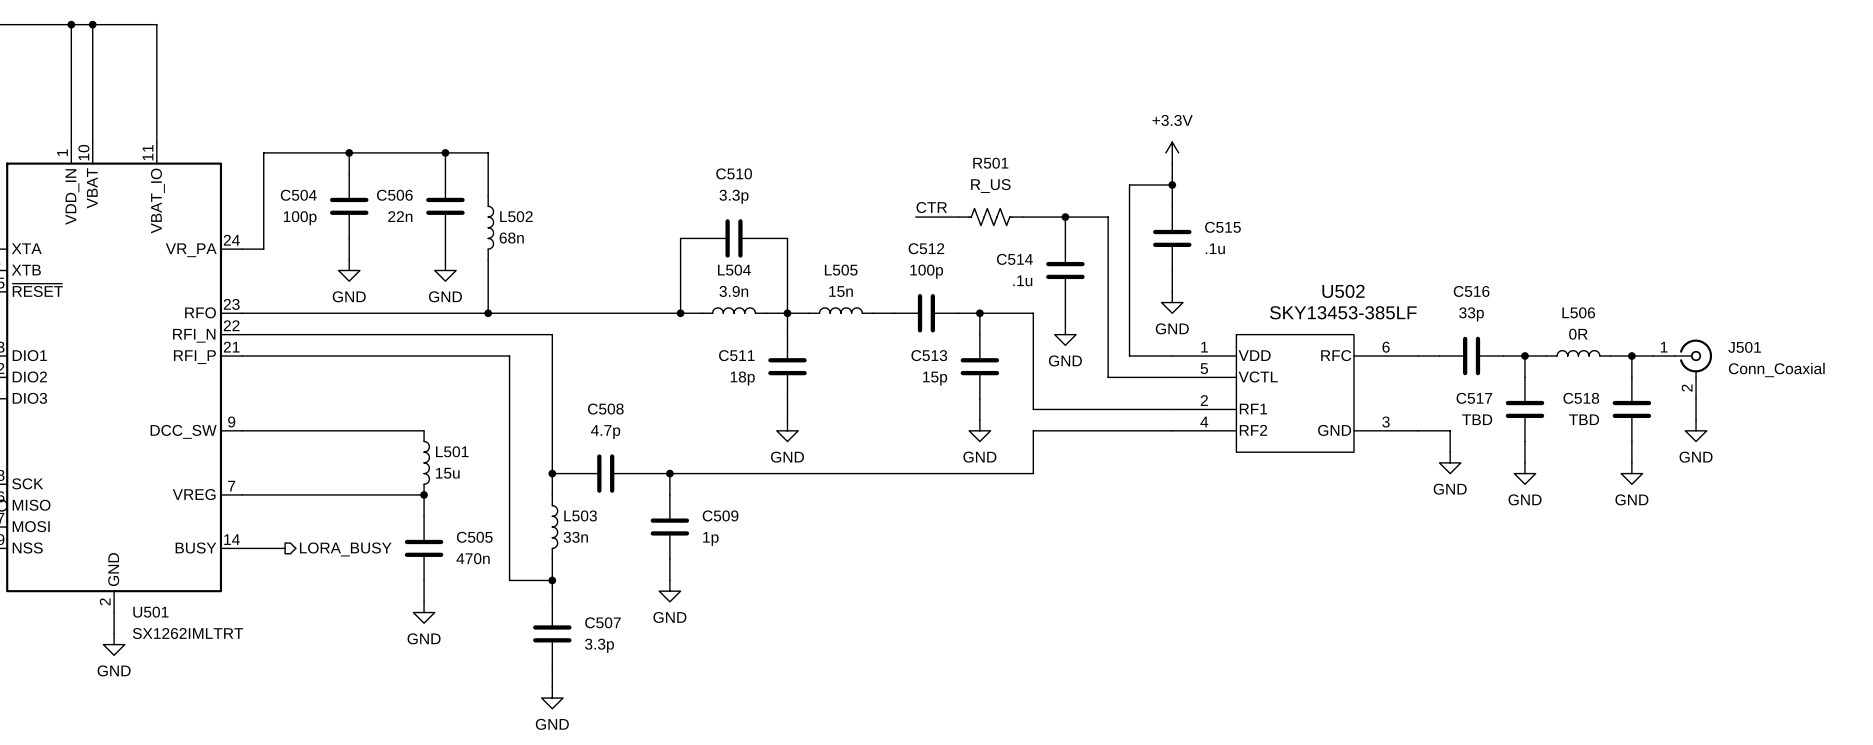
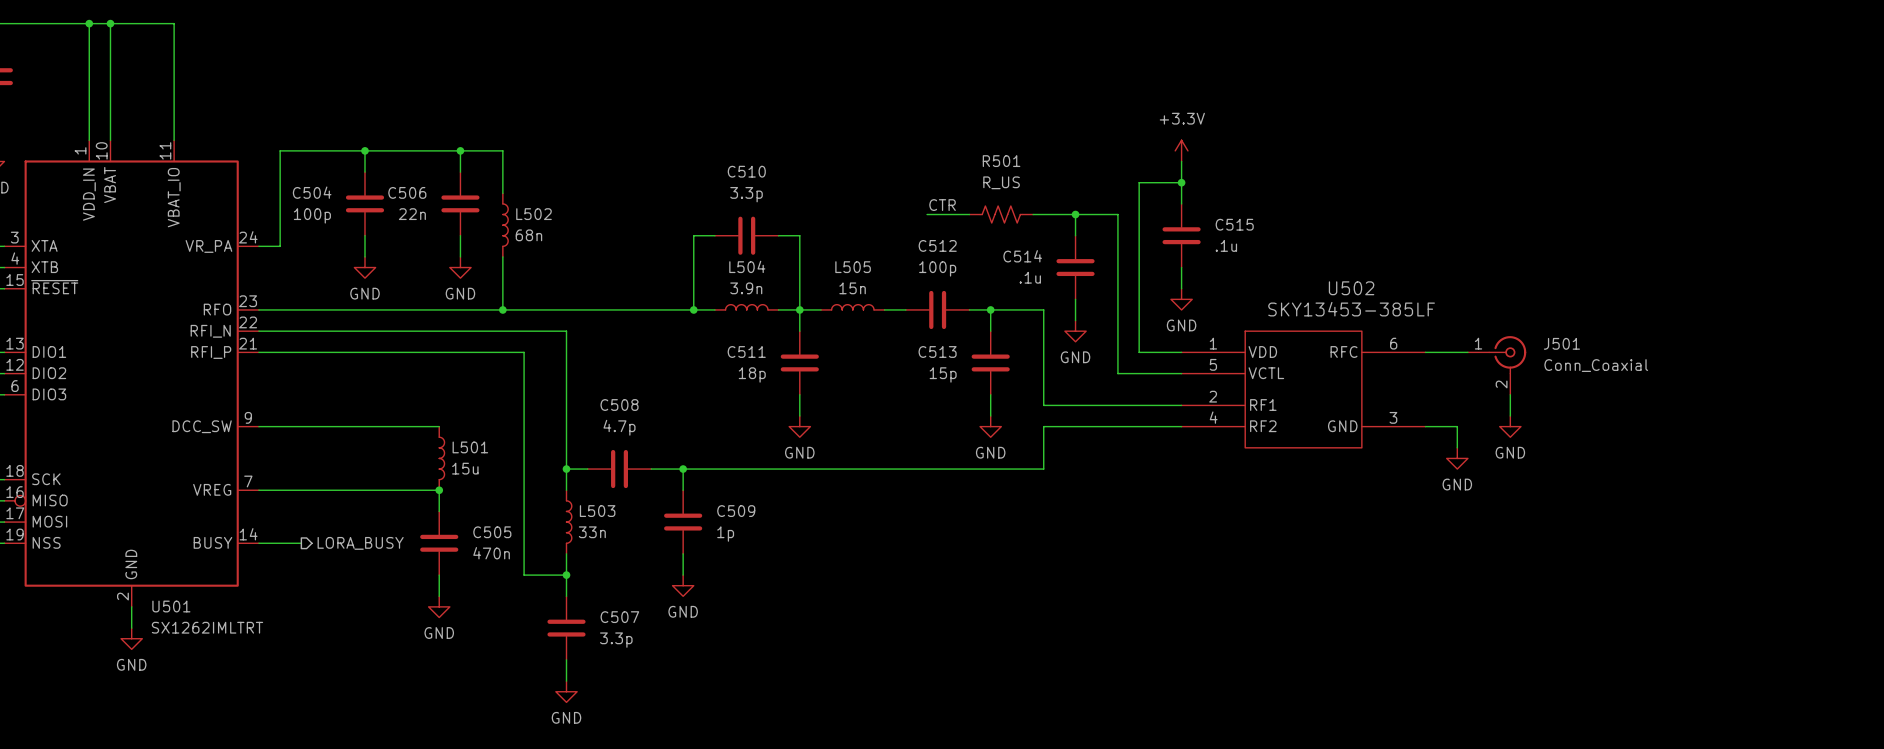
L506: 0R (1578, 353) -> none
C516: 33p (1471, 356) -> none
wire: (1503, 356) (1546, 356) -> none
wire: (1525, 356) (1525, 377) -> (1510, 394) (1510, 416)
junction: (1525, 356) -> none
wire: (1610, 356) (1653, 356) -> none
wire: (1631, 356) (1631, 377) -> none
junction: (1631, 356) -> none
J501 position: (1682, 369) -> (1497, 365)
wire: (1696, 398) (1696, 420) -> none
C517: TBD (1525, 409) -> none
C518: TBD (1631, 409) -> none
power symbol: GND (1696, 430) -> none
wire: (1525, 441) (1525, 462) -> none
wire: (1631, 441) (1631, 462) -> none
power symbol position: GND (1525, 473) -> GND (1510, 426)
power symbol: GND (1631, 473) -> none

